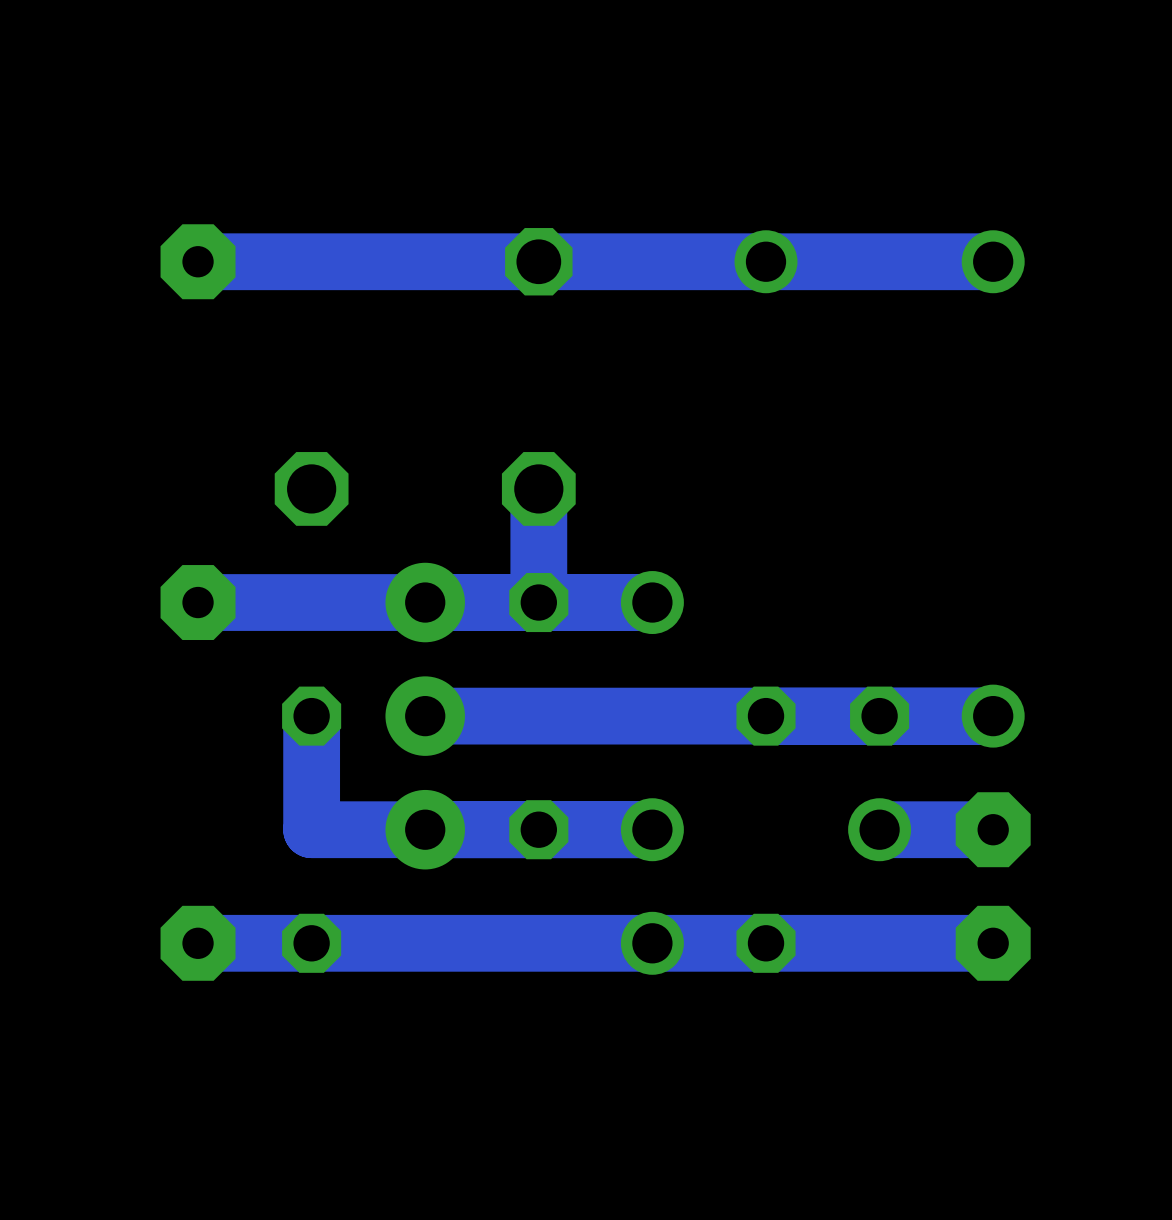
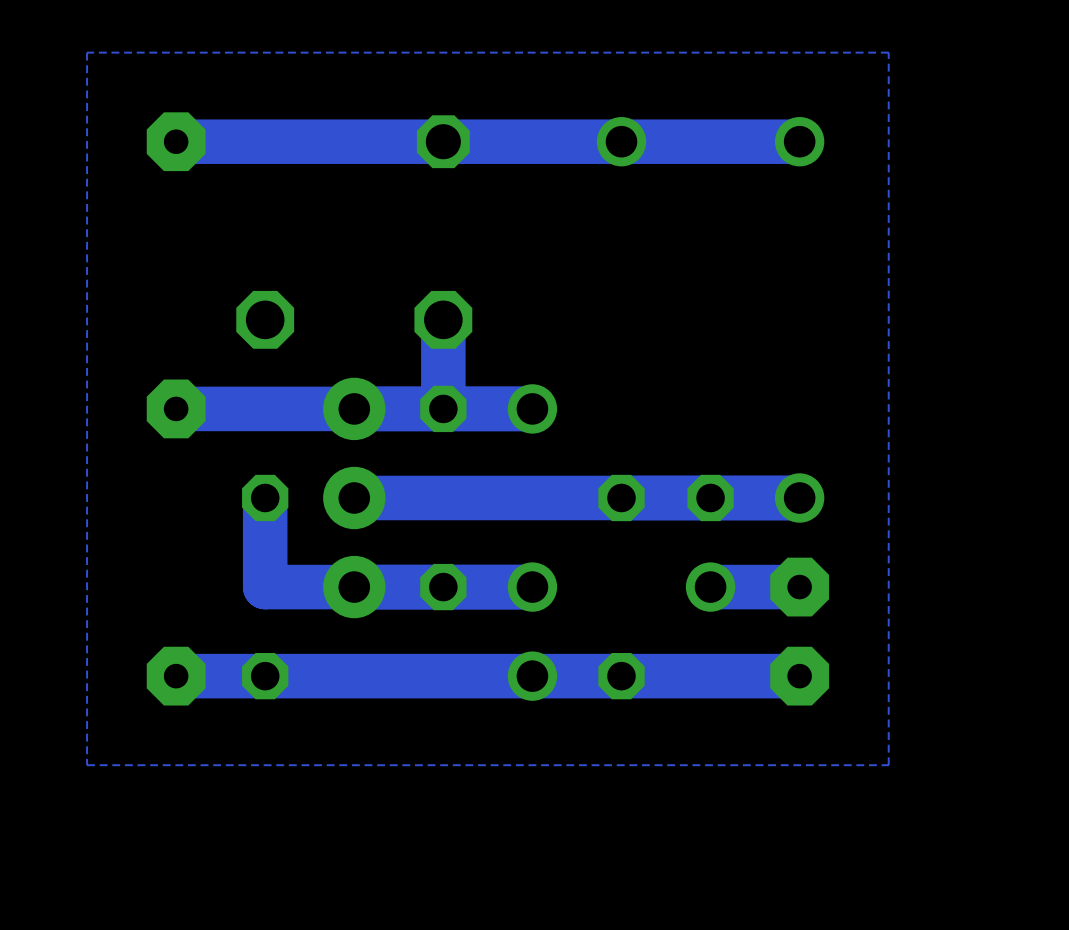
zone outline: none -> (888, 52) (888, 765) (87, 765) (87, 52) (888, 52)

